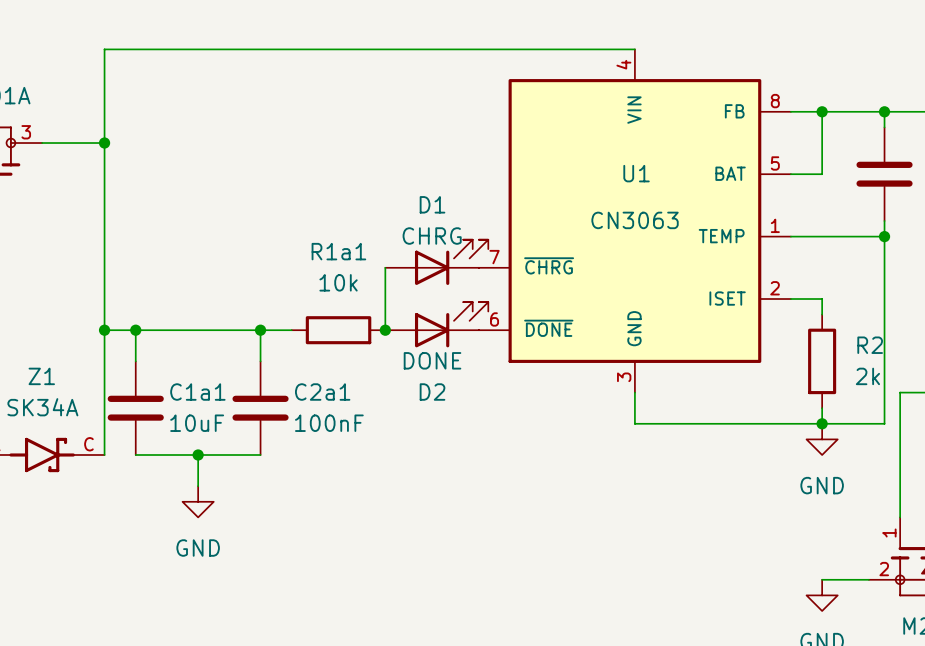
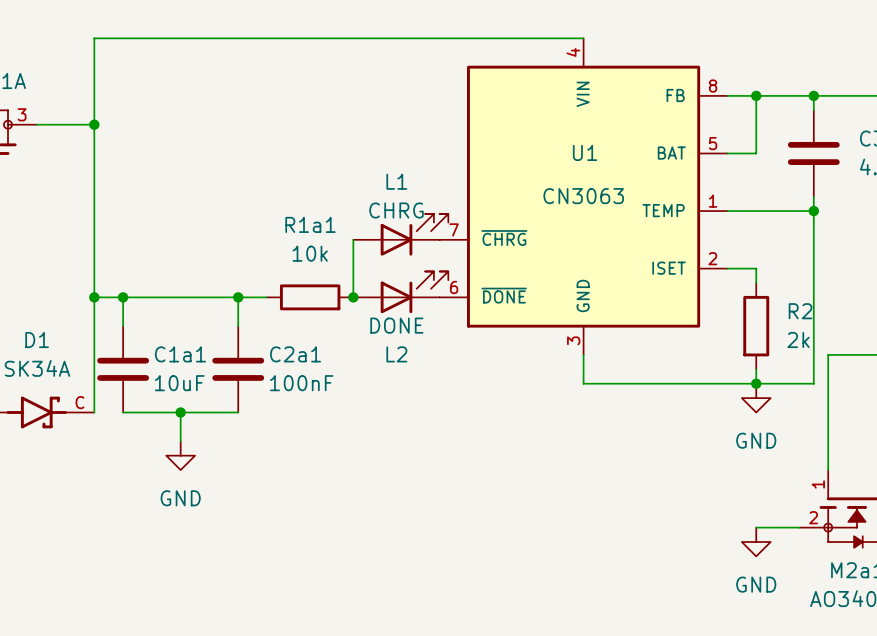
D1 name: D1 (432, 204) -> L1 (396, 181)
Z1 name: Z1 (41, 376) -> D1 (37, 340)
D2 name: D2 (432, 392) -> L2 (396, 354)

